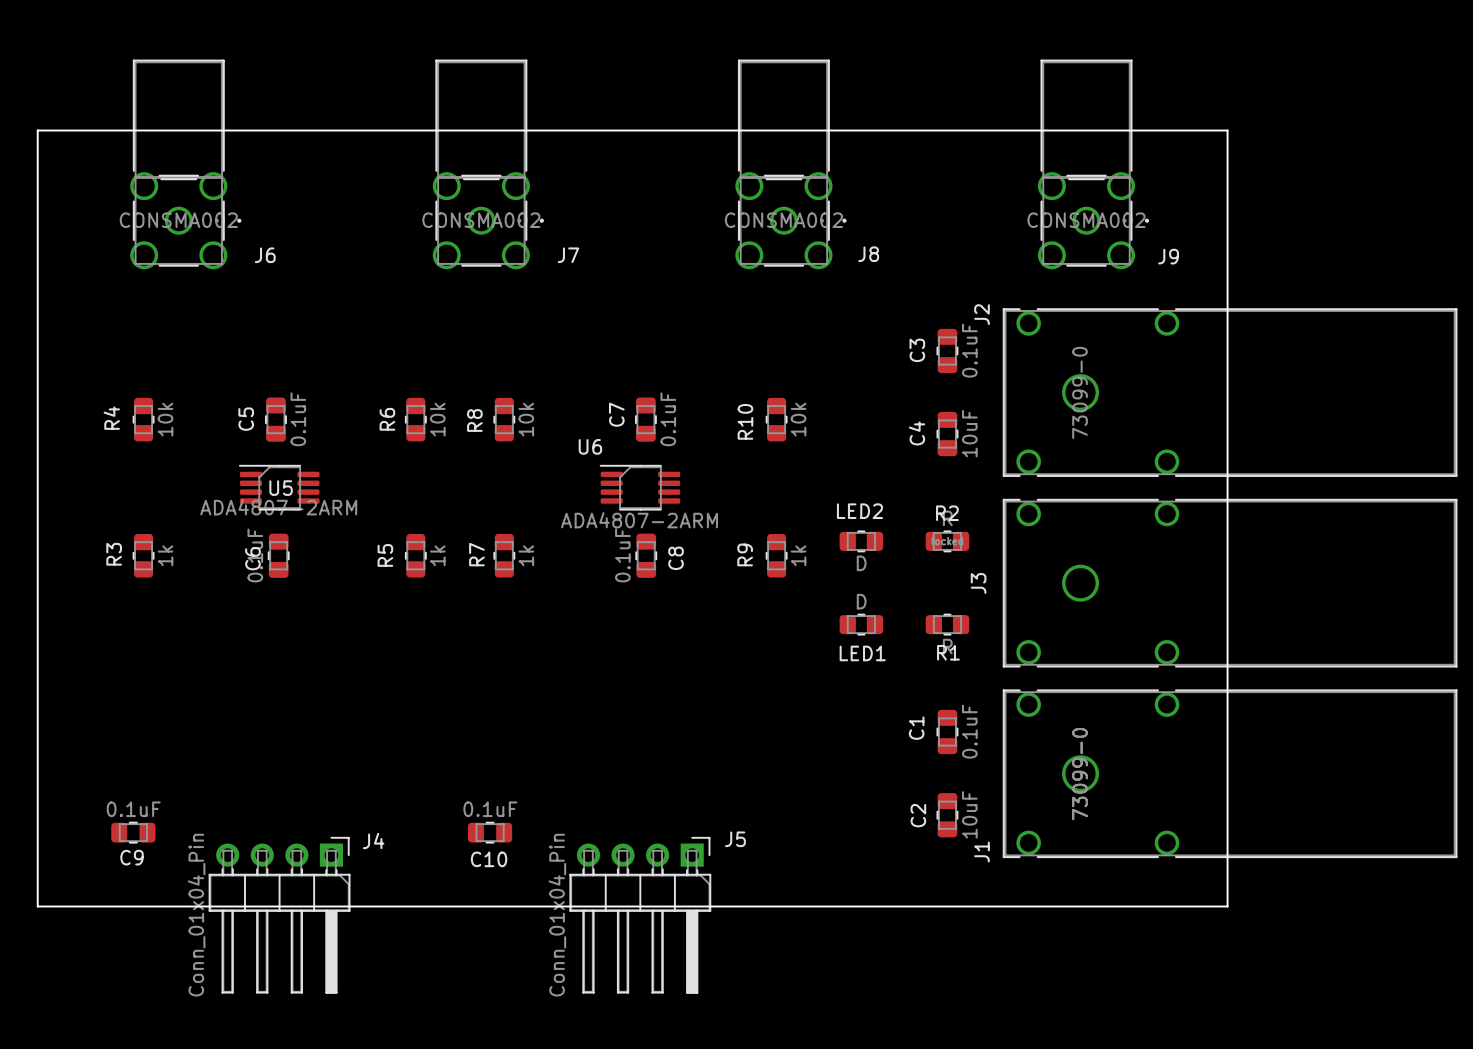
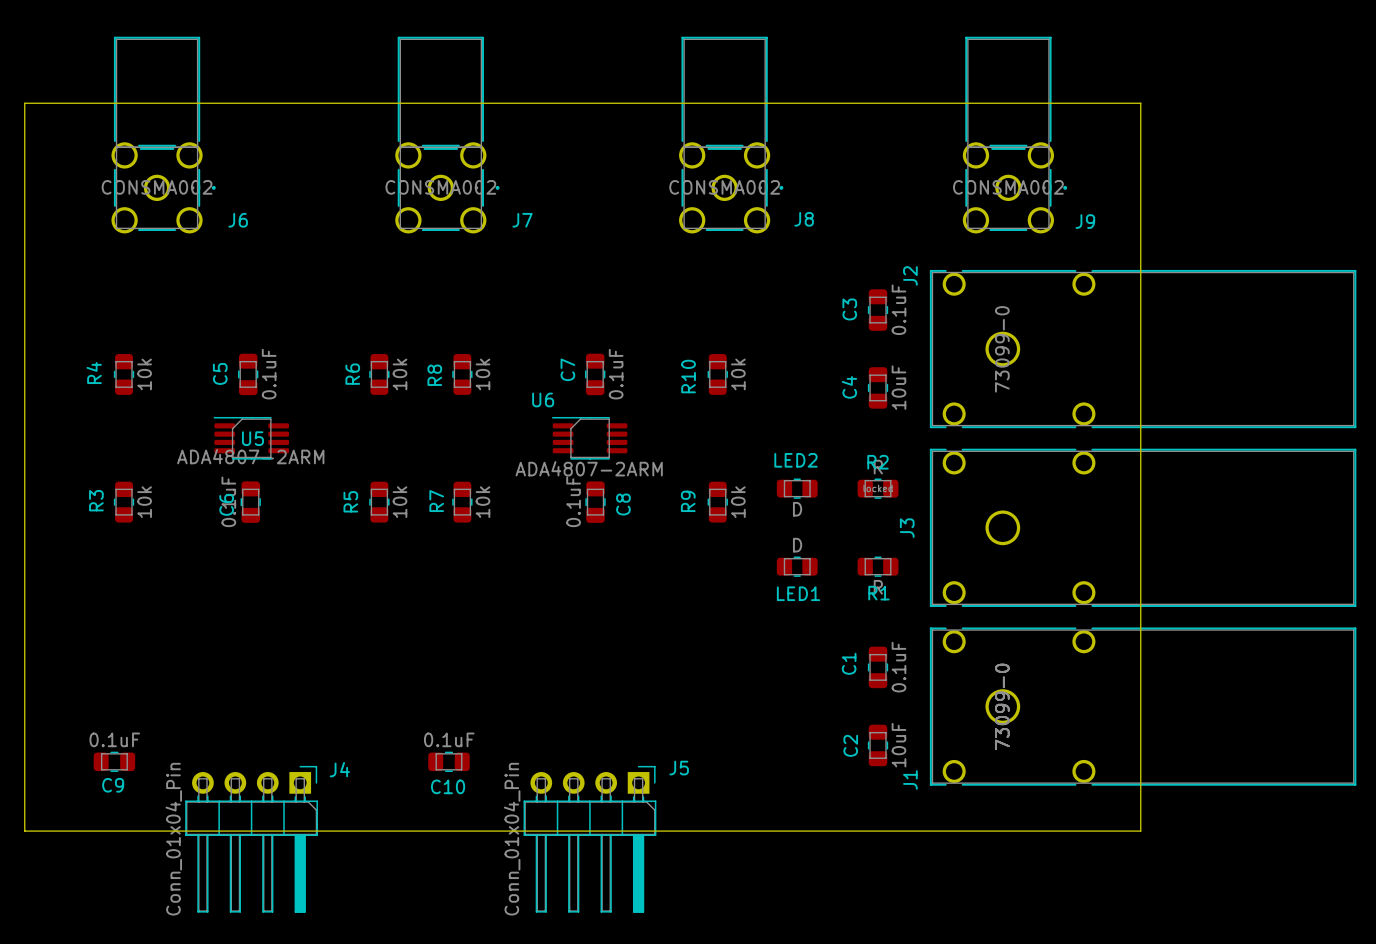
R3 value: 1k (165, 555) -> 10k (144, 502)
R5 value: 1k (437, 555) -> 10k (399, 502)
R7 value: 1k (526, 555) -> 10k (482, 502)
R9 value: 1k (798, 555) -> 10k (738, 502)

